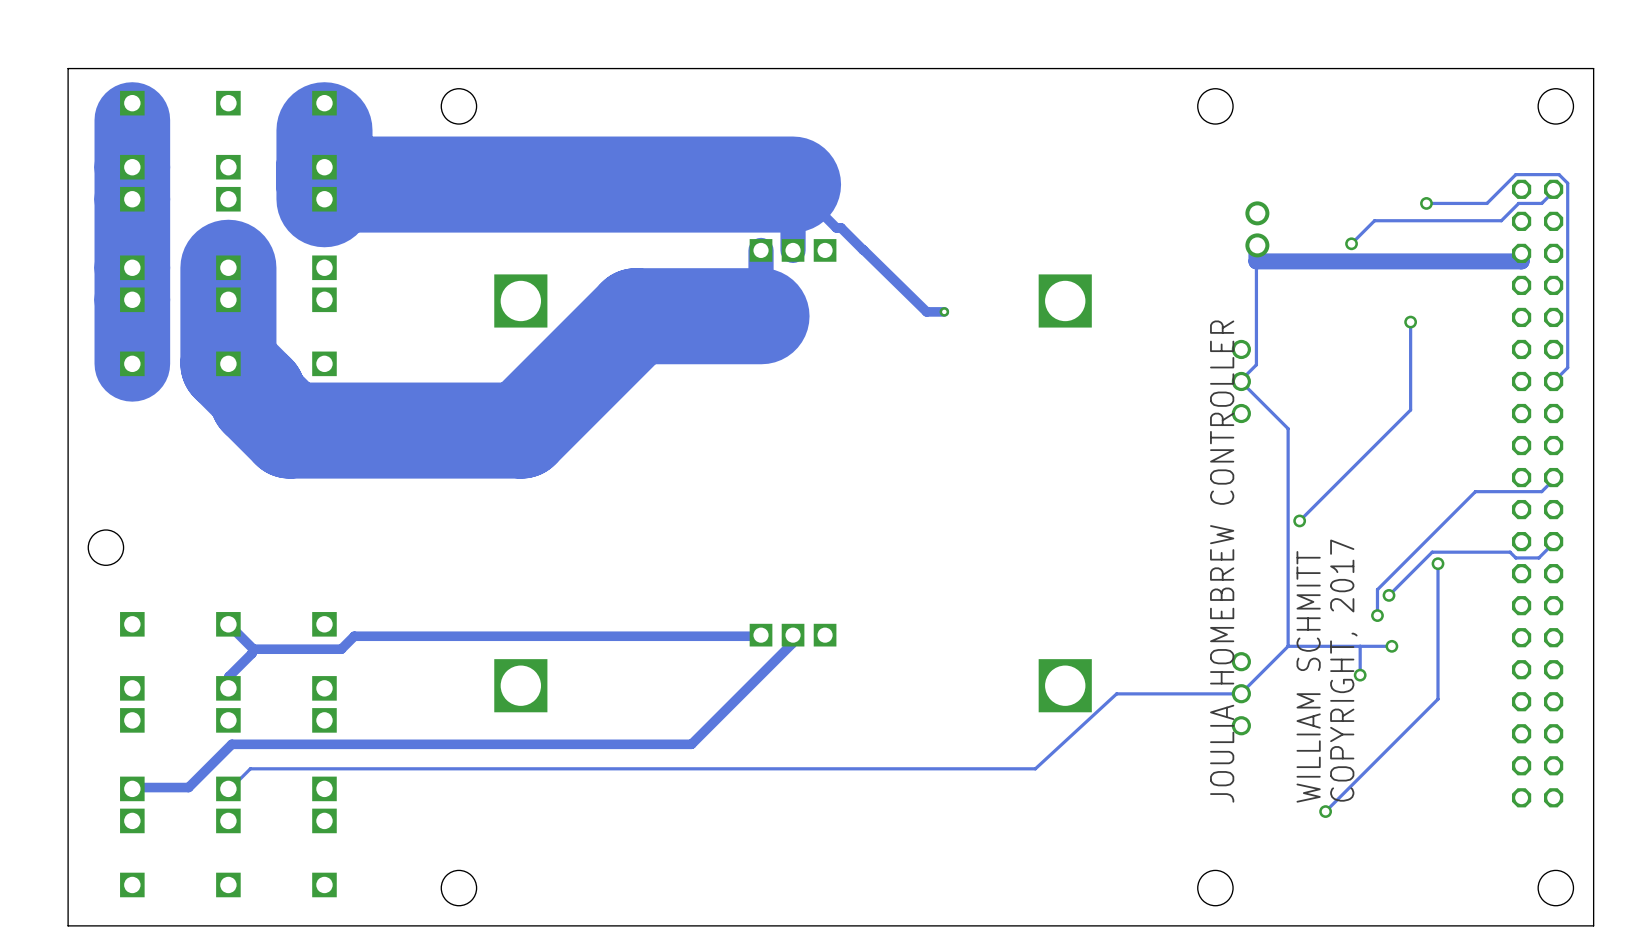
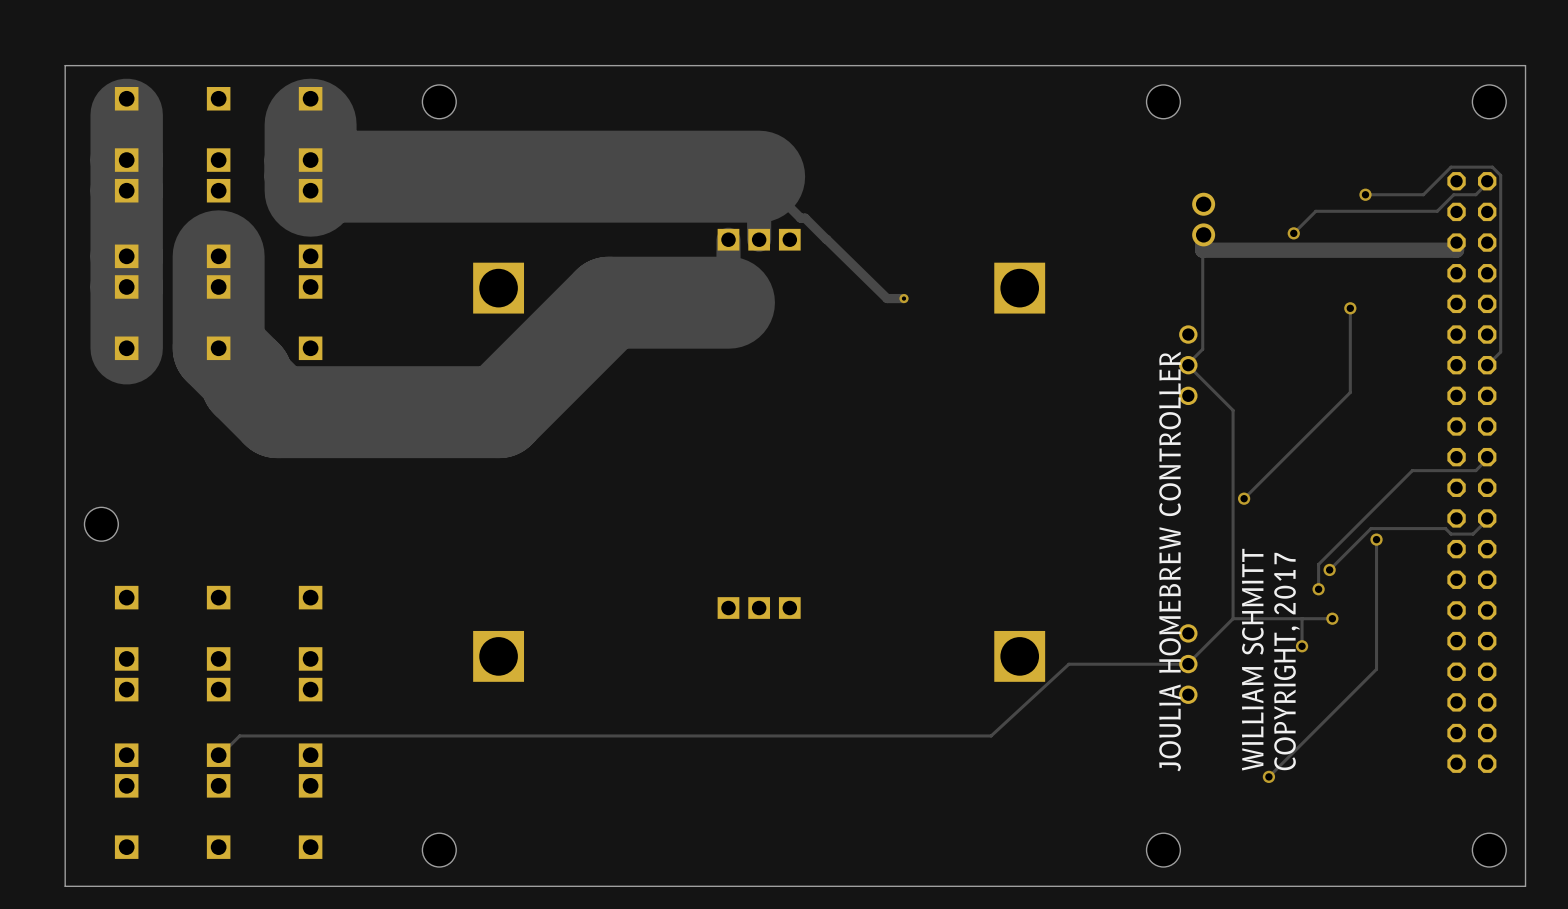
track: (228, 624) (253, 649) -> none
track: (761, 635) (354, 636) (341, 649) (253, 649) -> none
track: (793, 635) (792, 643) (691, 744) (231, 744) (188, 787) (132, 788) -> none
track: (253, 649) (252, 653) (228, 676) (228, 688) -> none

